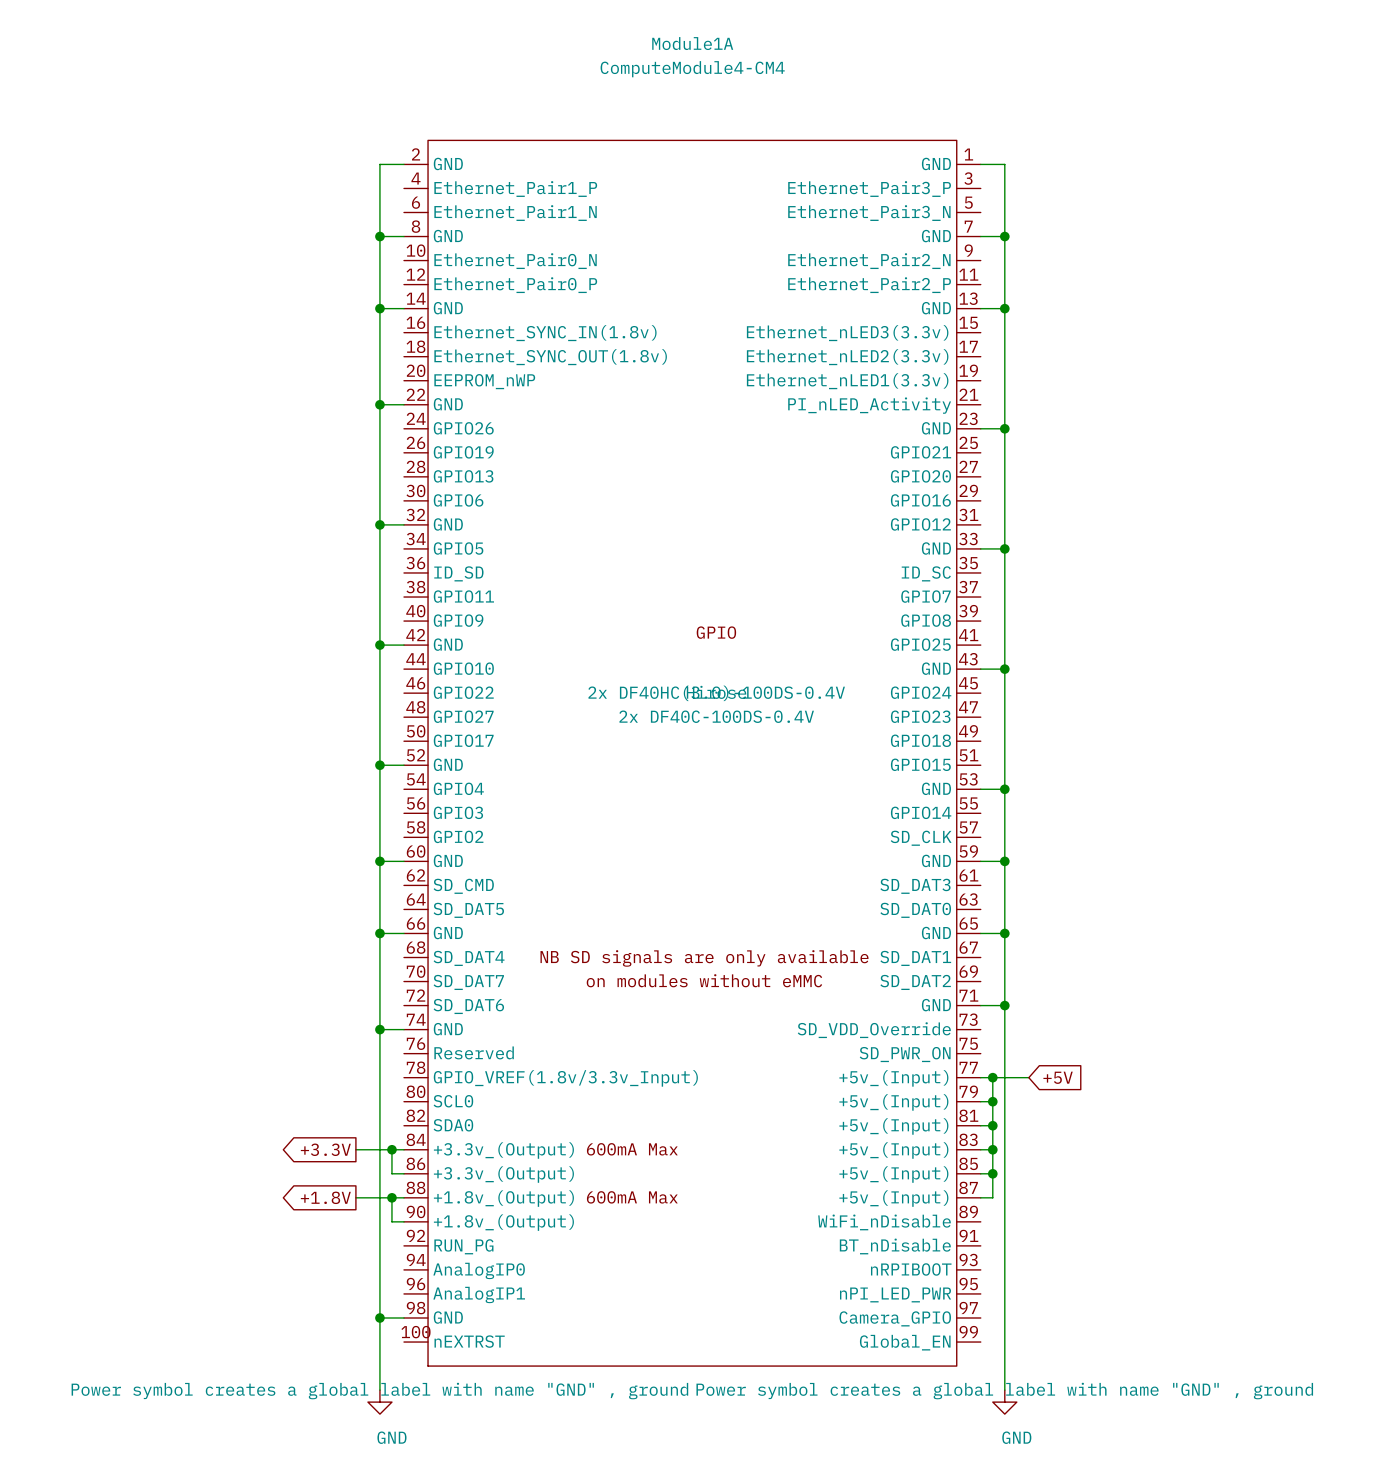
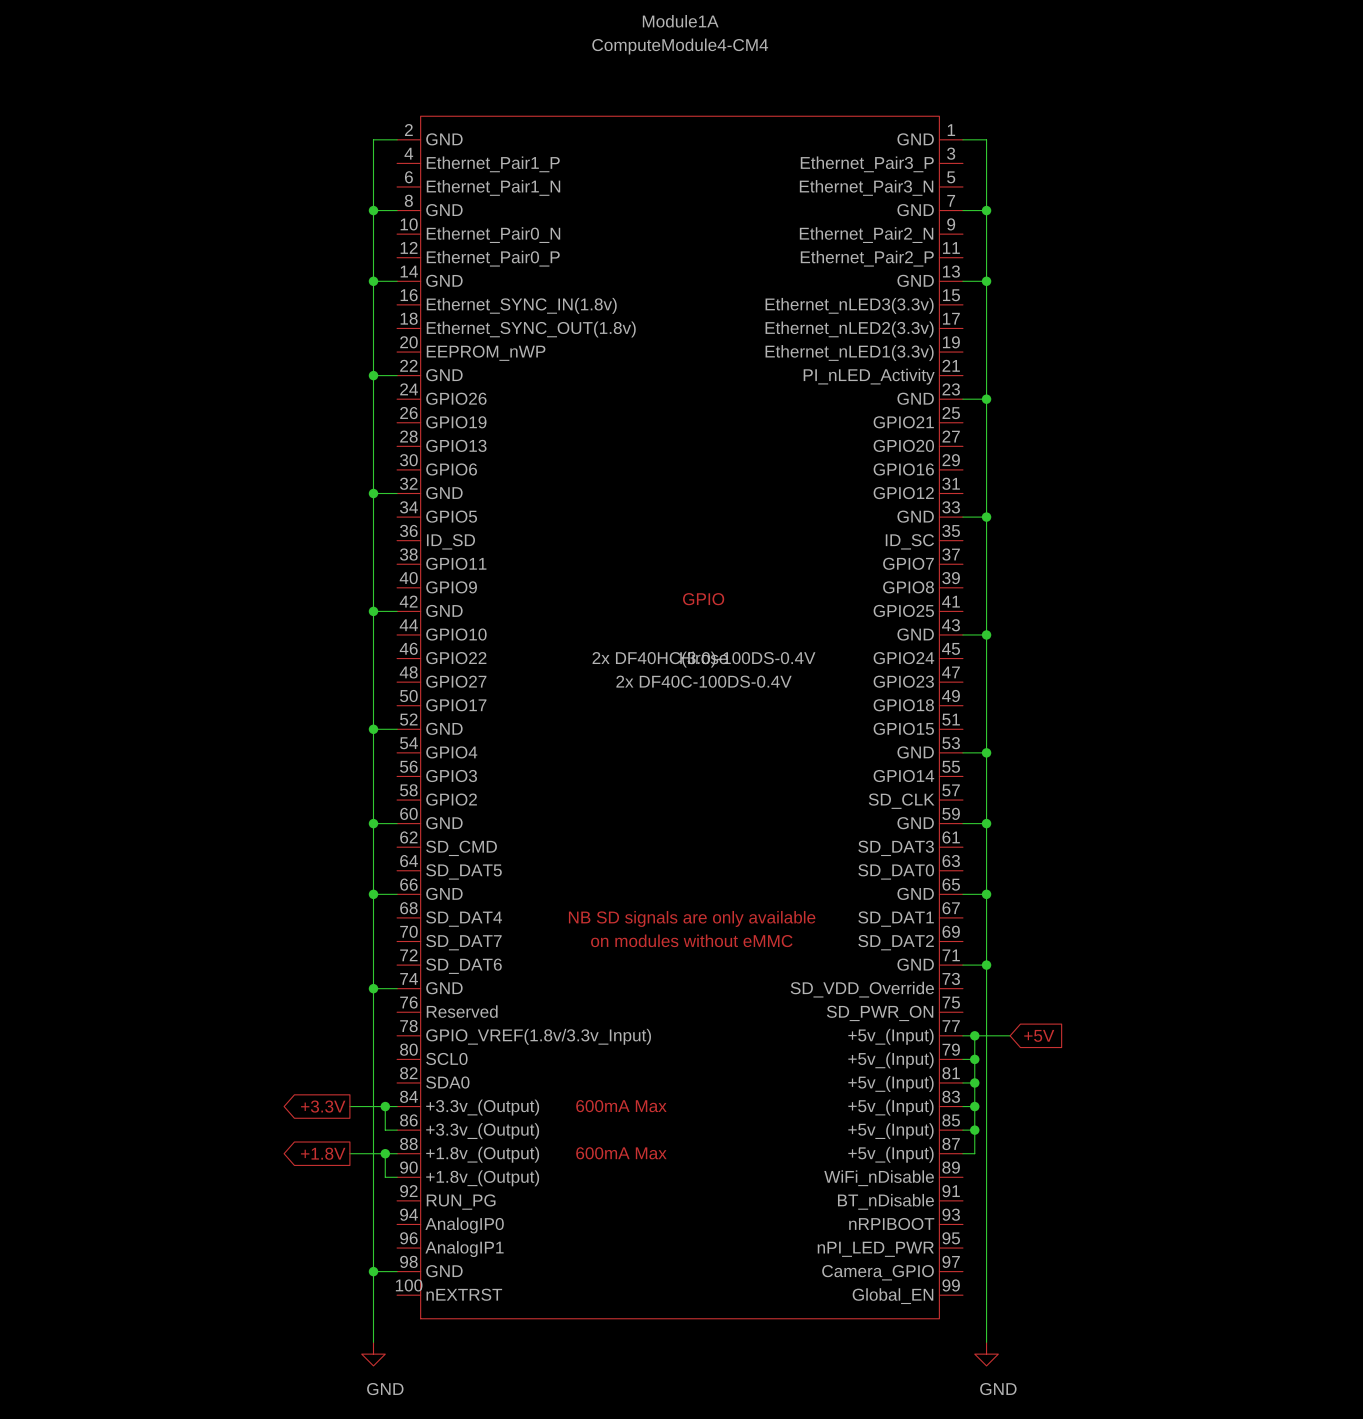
power symbol text: Power symbol creates a global label with name "GND" , ground (379, 1391) -> none
power symbol text: Power symbol creates a global label with name "GND" , ground (1004, 1391) -> none

